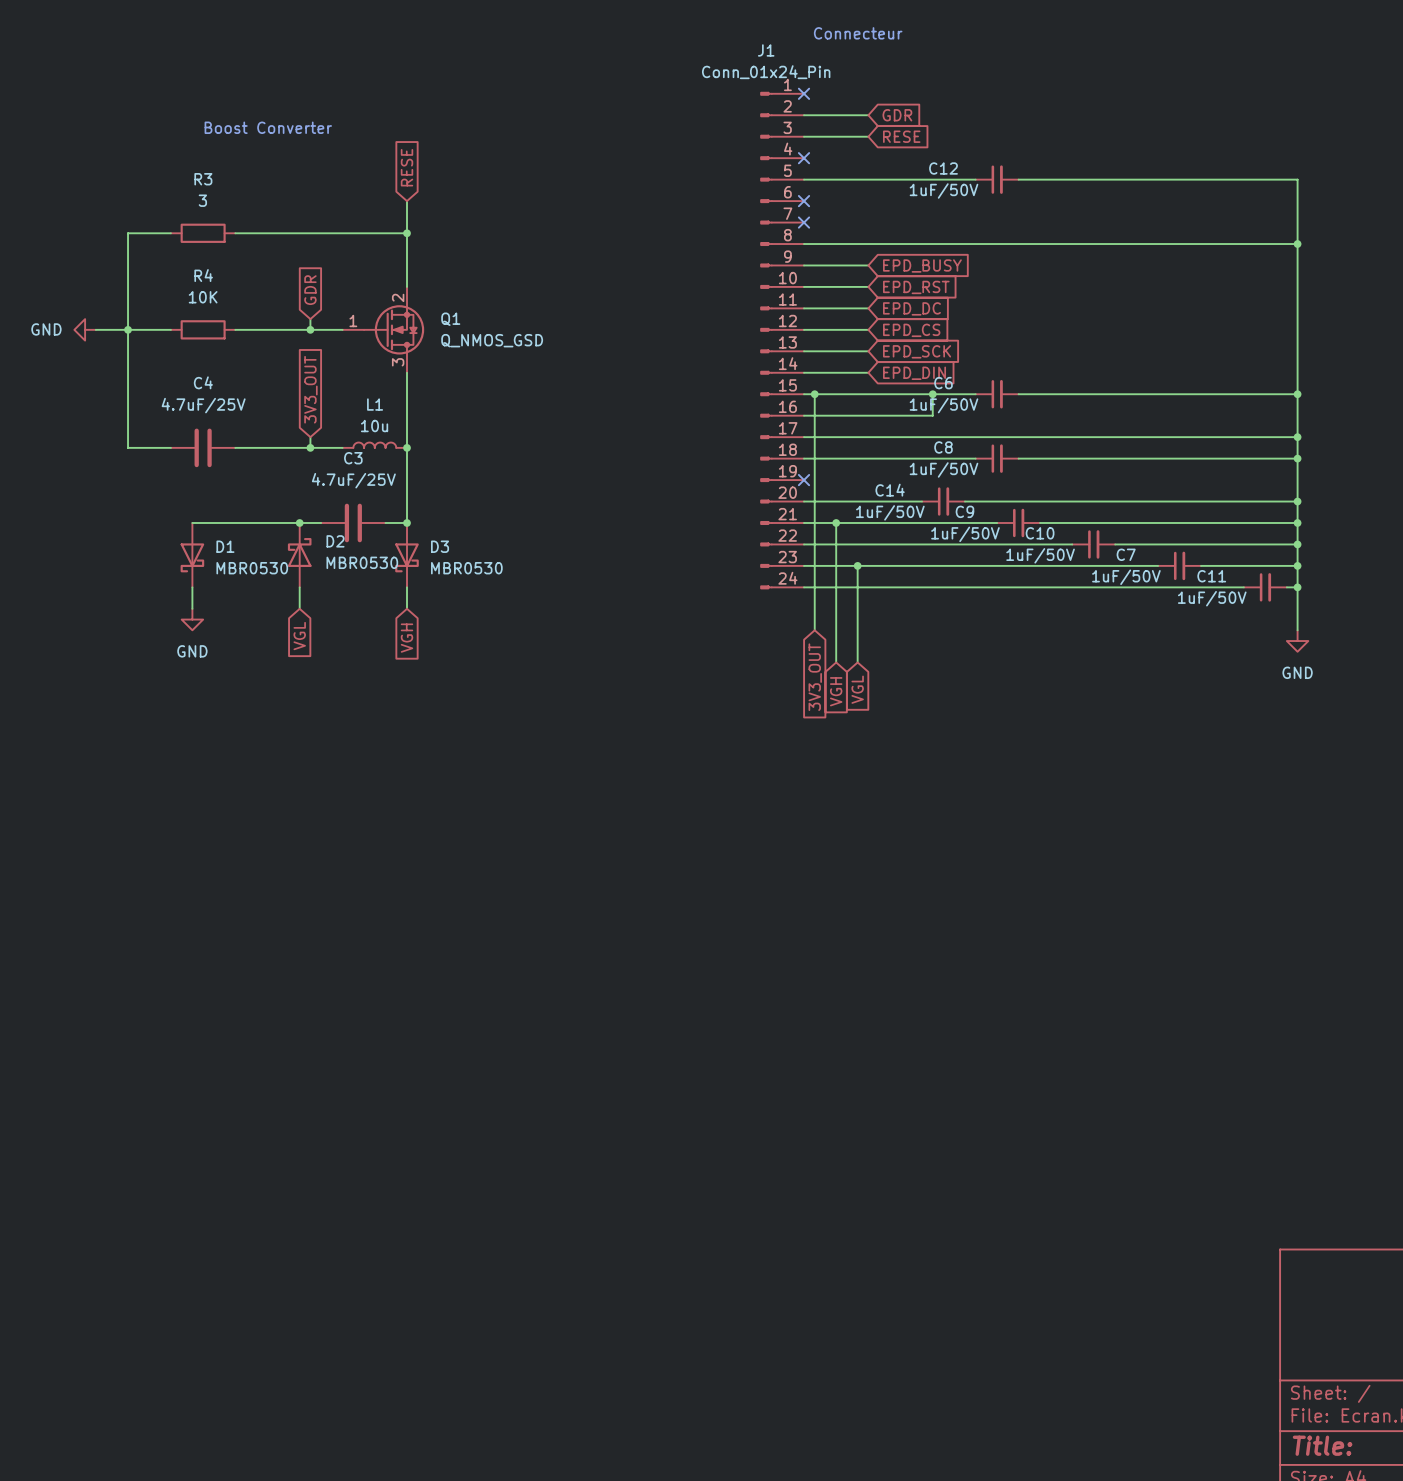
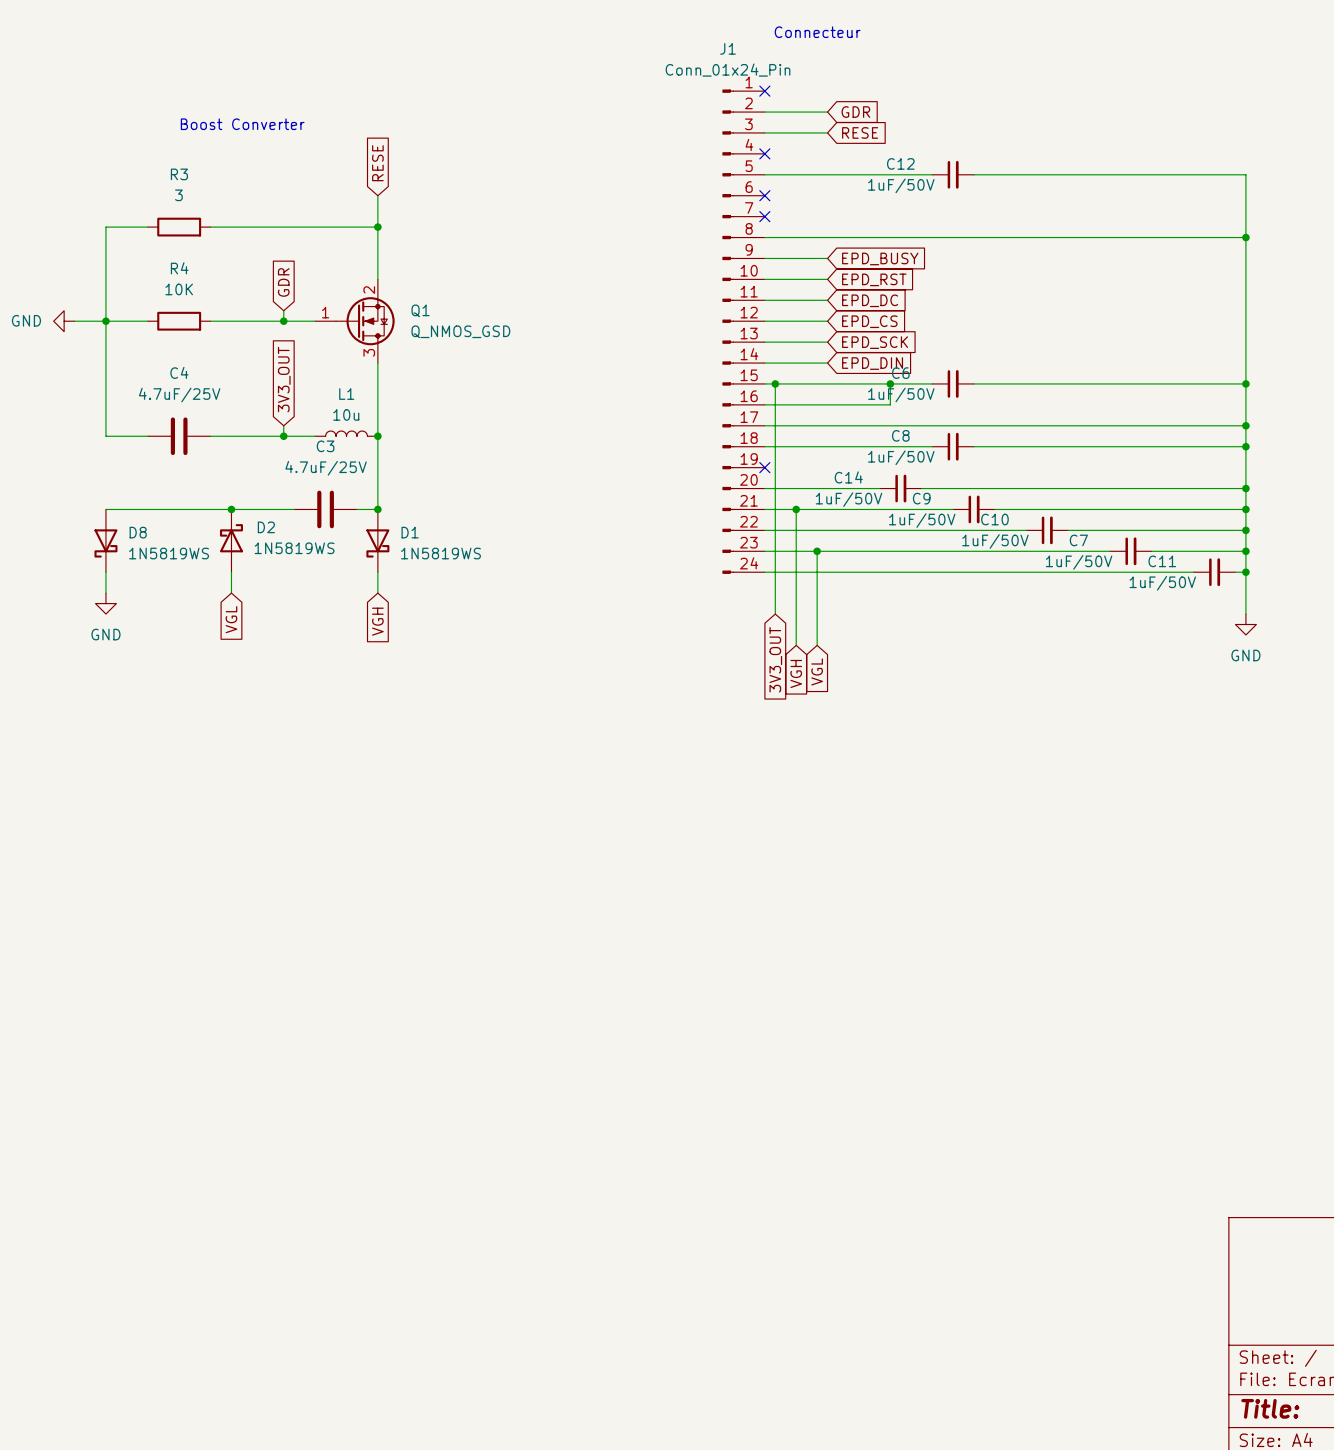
wire: none -> (105, 509) (168, 509)
junction position: (299, 522) -> (231, 509)
D3 name: D3 (440, 546) -> D1 (410, 532)
D8: none -> 1N5819WS (105, 540)
D1: MBR0530 (192, 555) -> none
D2 position: (299, 555) -> (231, 540)
D2 value: MBR0530 (362, 562) -> 1N5819WS (294, 548)
D3 value: MBR0530 (466, 568) -> 1N5819WS (440, 553)
wire: (192, 587) (192, 608) -> (105, 572) (105, 593)
wire: (299, 587) (299, 608) -> (231, 572) (231, 593)
power symbol position: GND (192, 619) -> GND (105, 603)
global label position: VGL (299, 636) -> VGL (231, 619)

